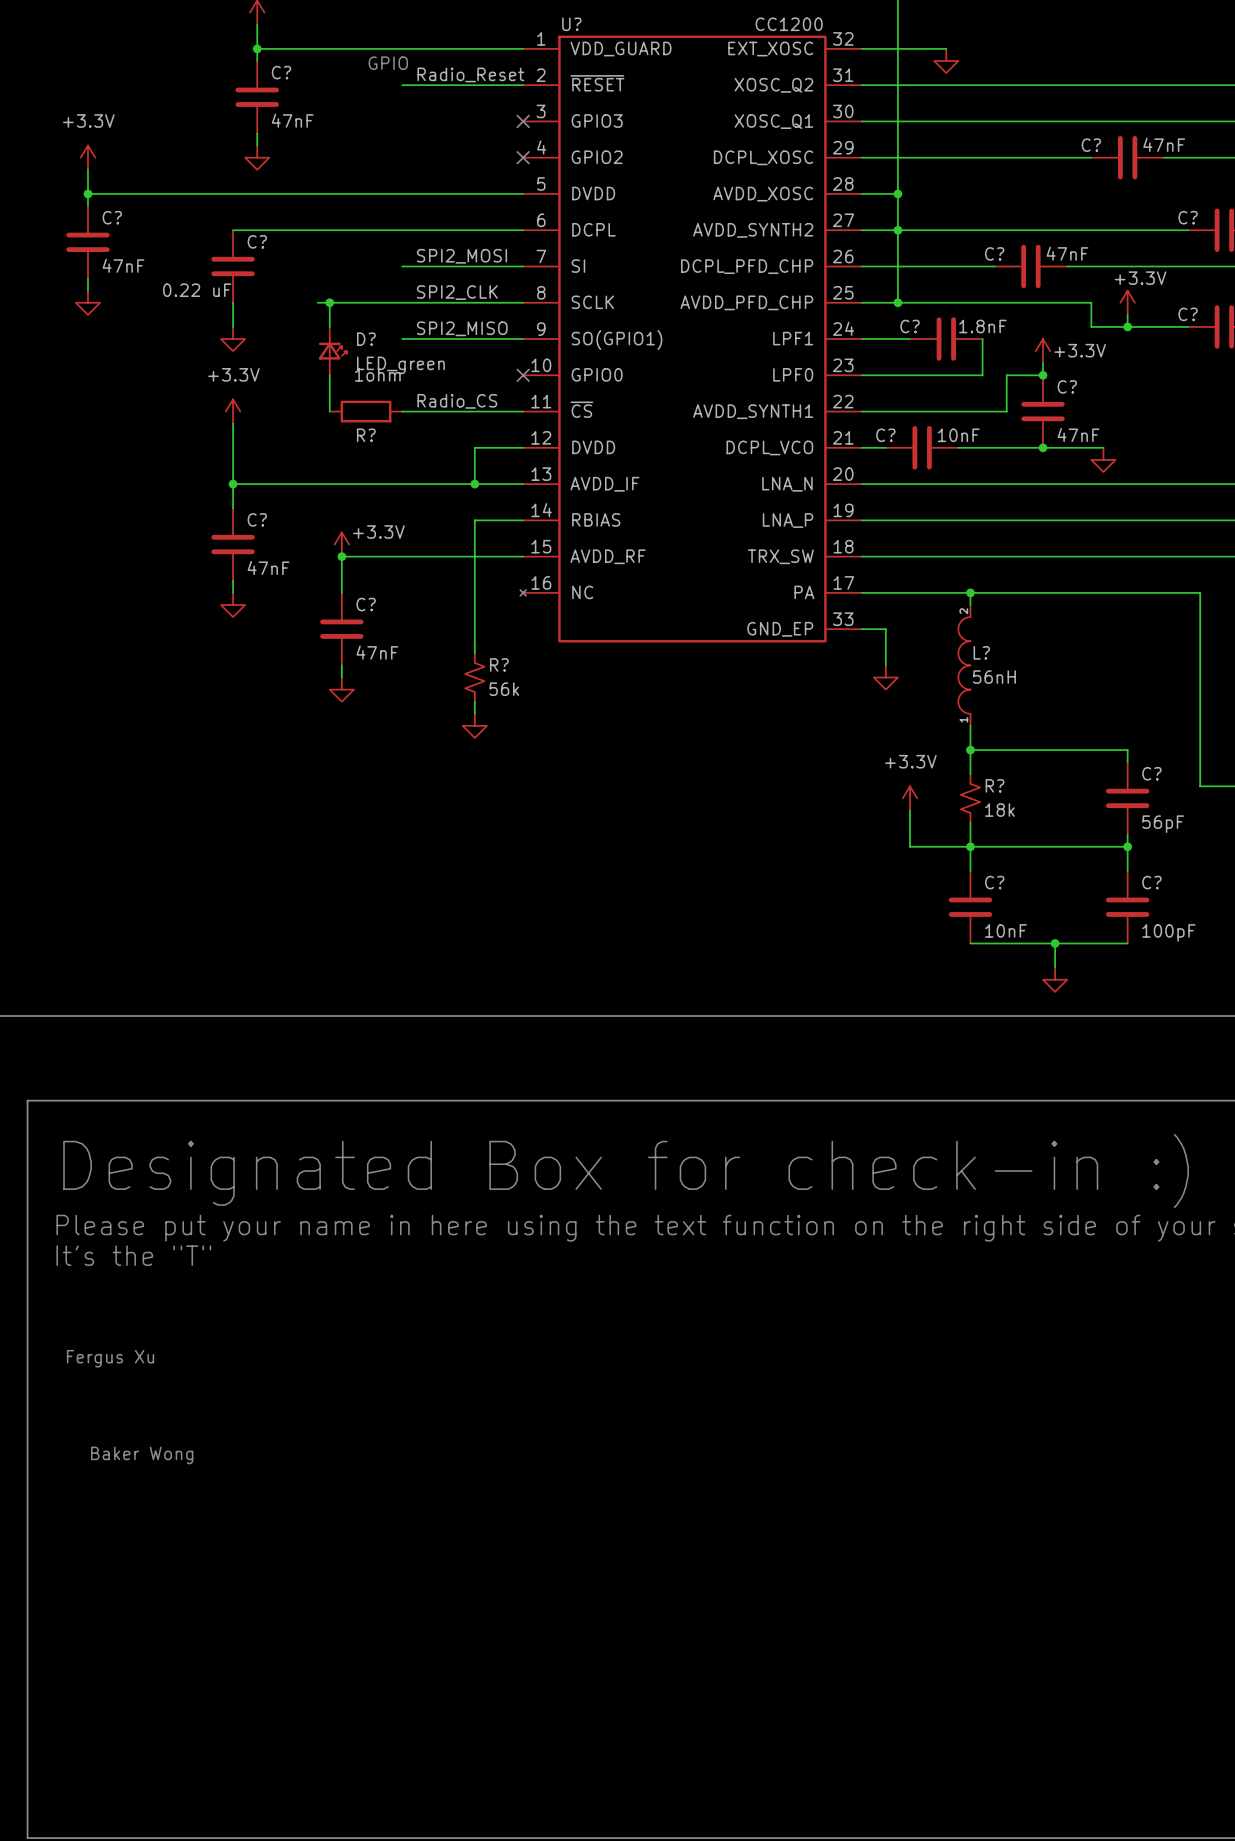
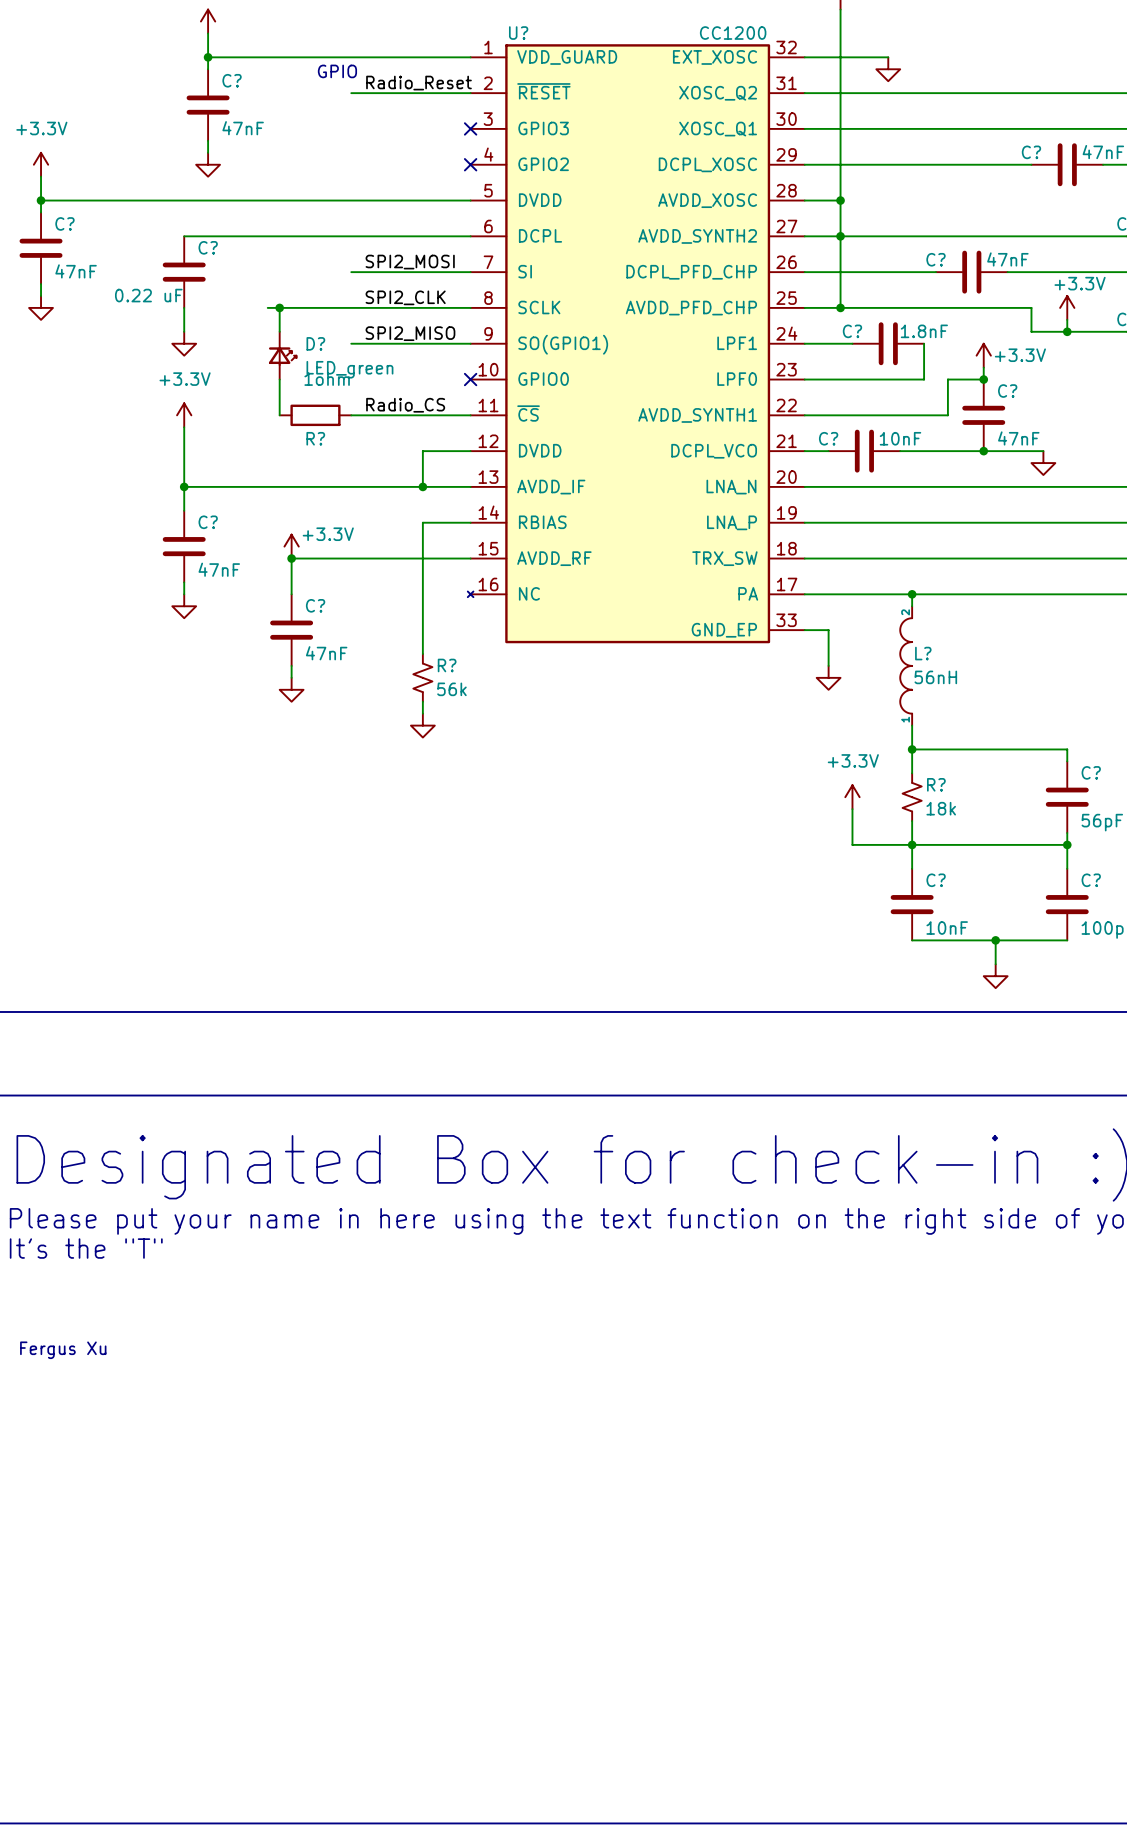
text: Baker Wong (142, 1455) -> none

